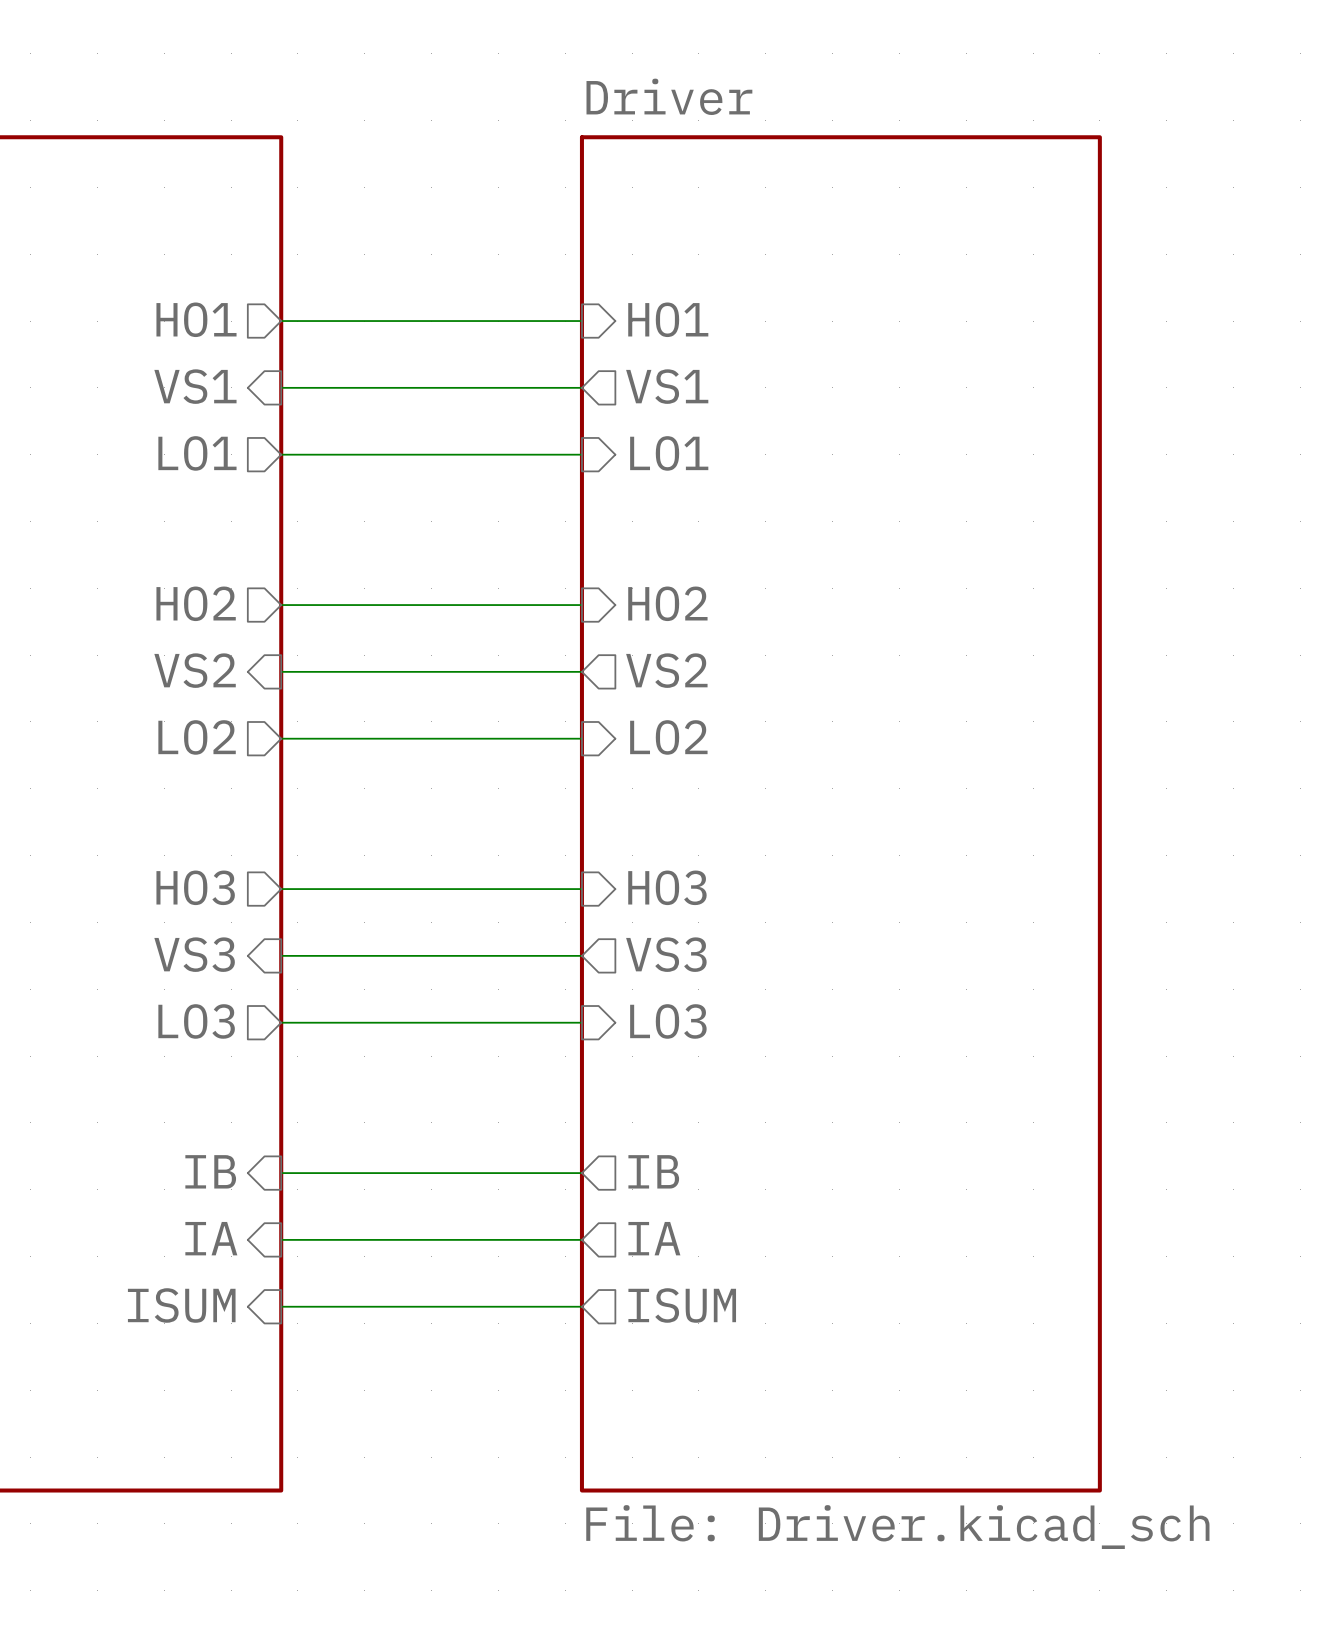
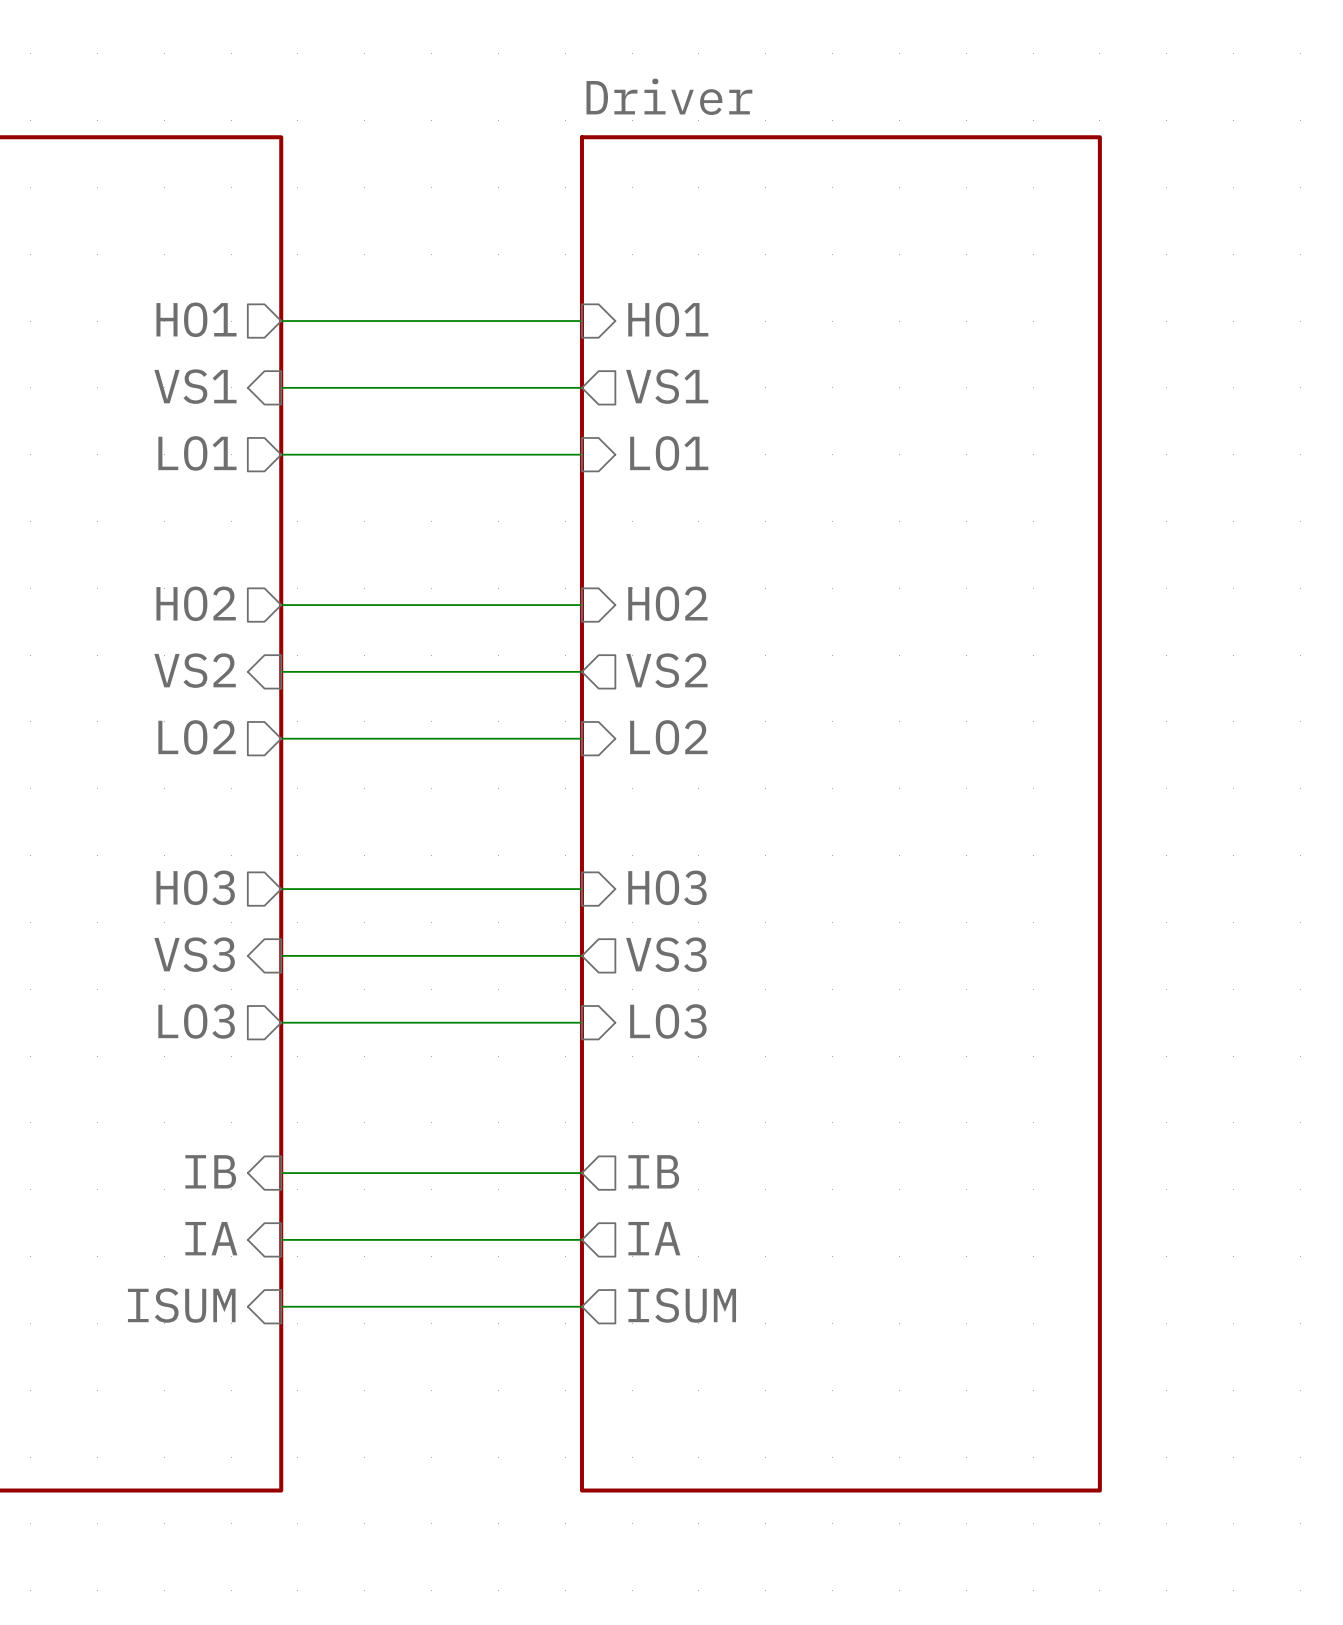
sheet Driver value: File: Driver.kicad_sch (897, 1527) -> none

